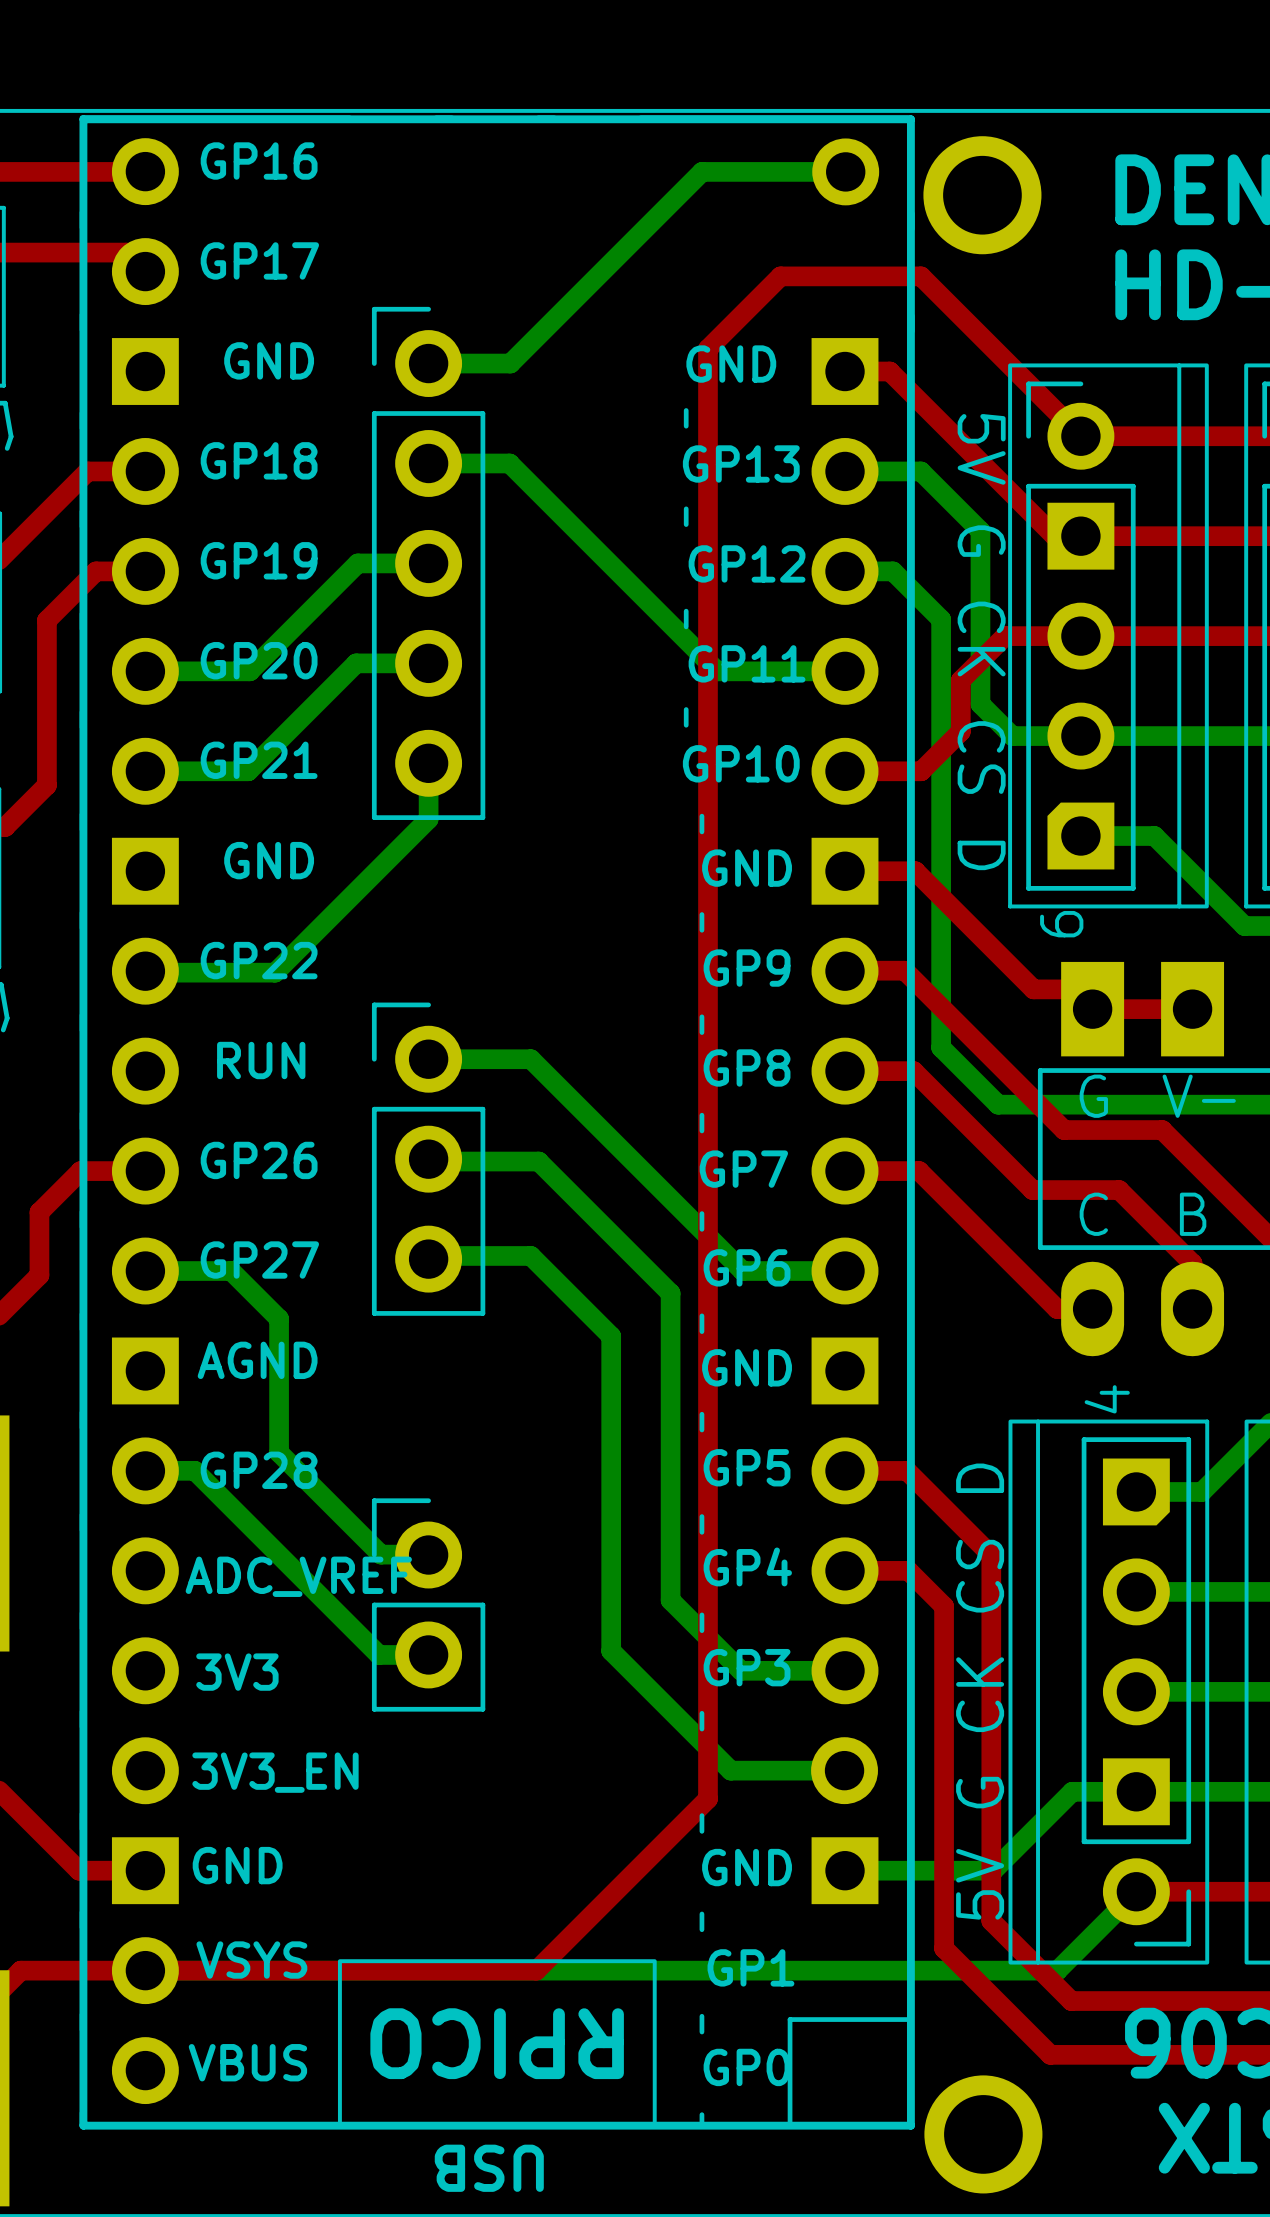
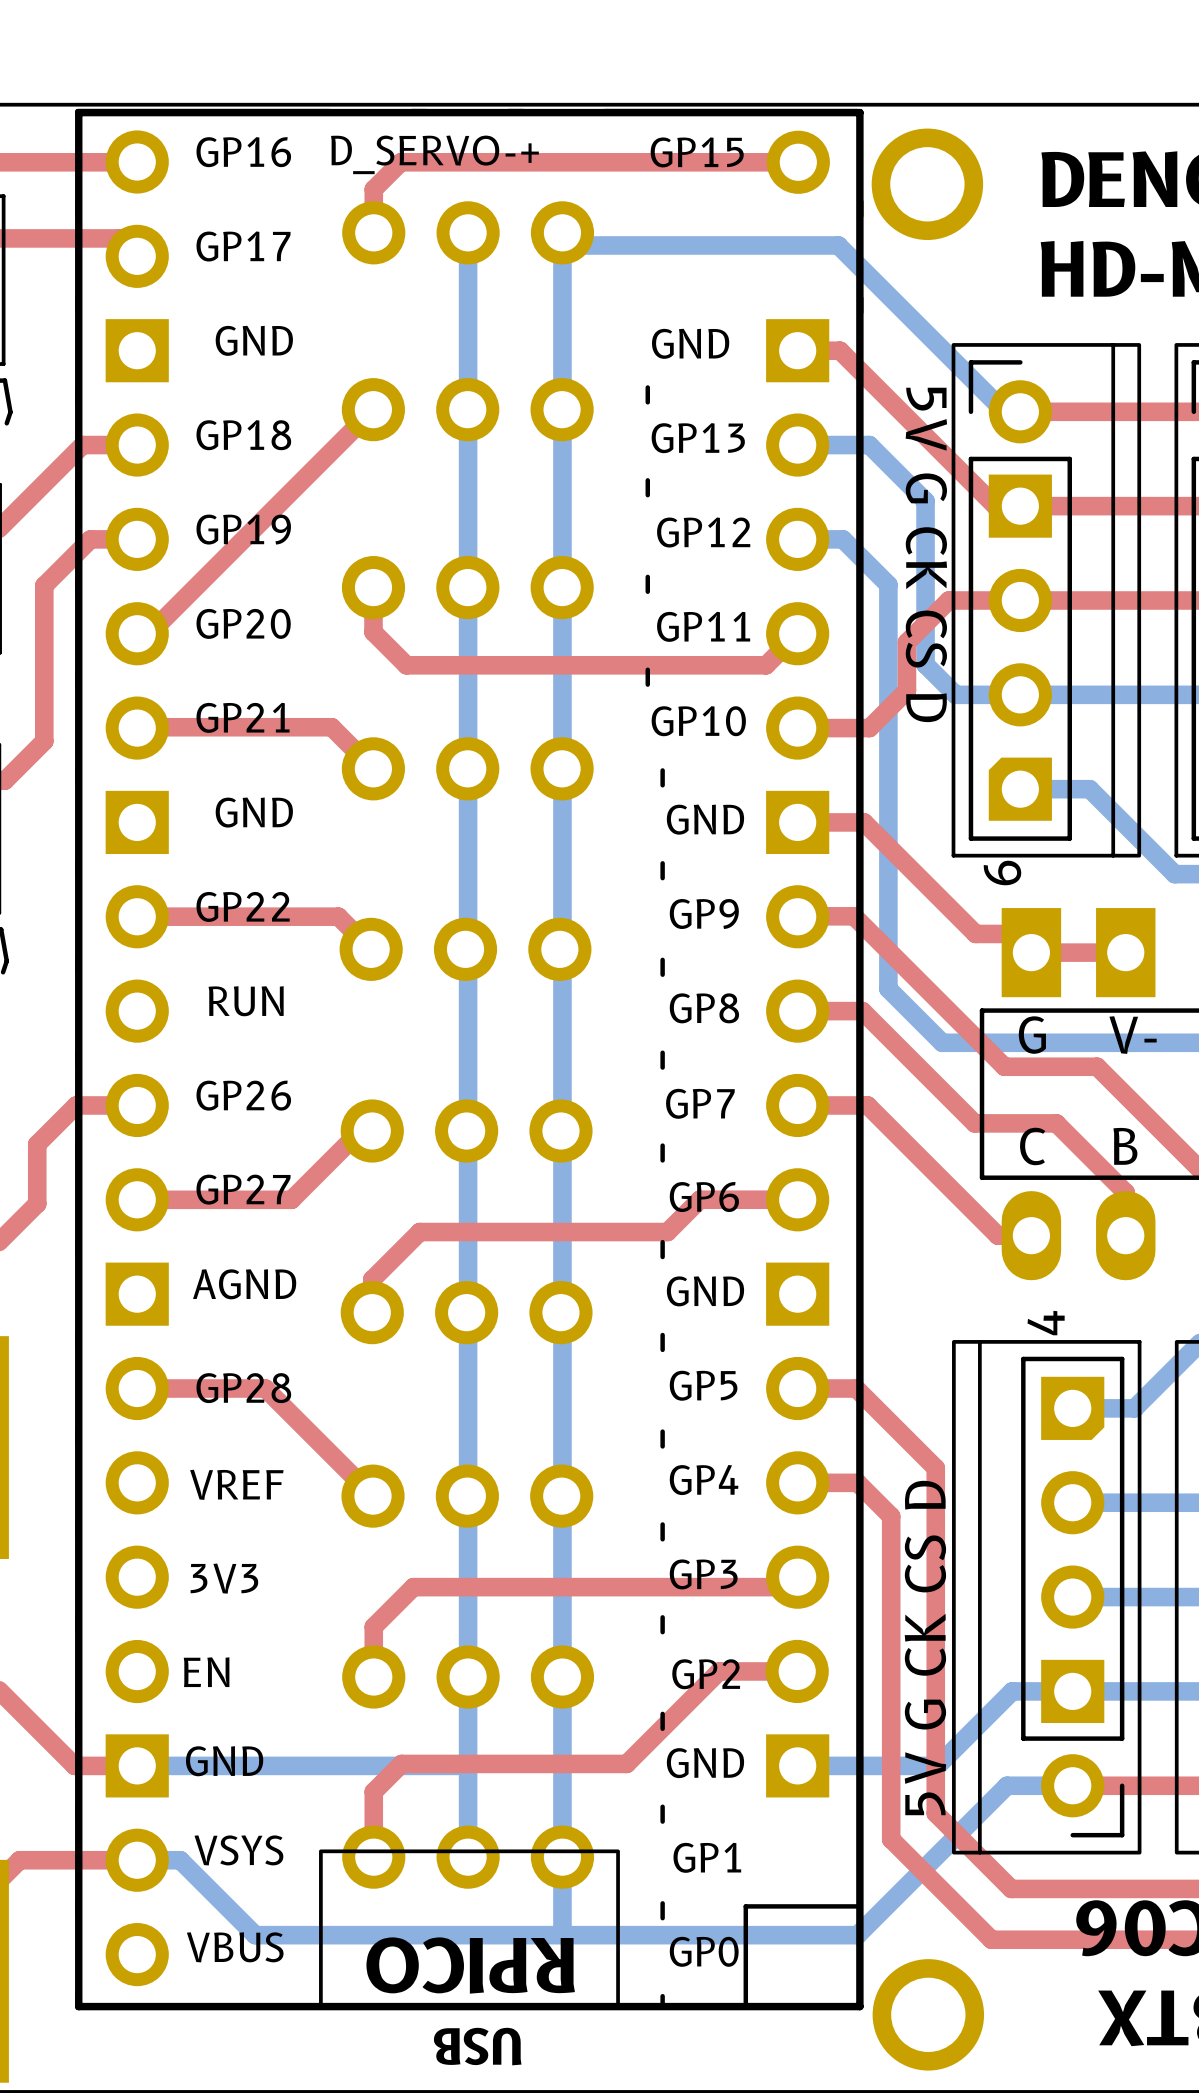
text: none -> D_SERVO-+ (434, 154)
text: none -> GP15 (697, 152)
top track: none -> (798, 162) (400, 162) (373, 189) (373, 232)
bottom track: (845, 171) (702, 171) (510, 363) (428, 363) -> none
bottom track: none -> (468, 232) (468, 1857)
part: none -> (468, 232)
part text: GND (731, 364) -> none
text: none -> GND (690, 343)
top track: none -> (373, 409) (149, 633) (137, 633)
part: none -> (467, 409)
top track: (1080, 436) (921, 276) (780, 276) (707, 348) (707, 1798) (536, 1970) (145, 1970) -> none
bottom track: none -> (1020, 411) (1004, 411) (838, 245) (575, 245) (562, 232) (562, 1934)
bottom track: (428, 463) (509, 463) (717, 671) (845, 671) -> none
bottom track: (428, 563) (357, 563) (249, 671) (145, 671) -> none
part: (428, 563) -> none
top track: none -> (373, 587) (373, 632) (406, 665) (766, 665) (797, 633)
part: none -> (467, 587)
bottom track: (428, 663) (356, 663) (248, 771) (145, 771) -> none
bottom track: (428, 763) (428, 819) (275, 972) (145, 971) -> none
top track: none -> (138, 727) (331, 727) (373, 768)
part: none -> (467, 768)
top track: none -> (137, 916) (338, 916) (371, 949)
part: none -> (465, 949)
bottom track: (428, 1059) (530, 1059) (742, 1271) (845, 1271) -> none
bottom track: (428, 1159) (430, 1161) (538, 1161) (670, 1293) (670, 1600) (741, 1670) (845, 1670) -> none
part: (428, 1159) -> none
top track: none -> (360, 1131) (291, 1199) (137, 1199) (140, 1203)
part: none -> (466, 1131)
bottom track: (428, 1259) (431, 1255) (530, 1255) (611, 1336) (611, 1651) (730, 1770) (844, 1770) -> none
top track: none -> (797, 1199) (699, 1199) (667, 1232) (419, 1232) (372, 1279) (372, 1312)
bottom track: (145, 1271) (231, 1271) (279, 1318) (279, 1452) (381, 1554) (428, 1554) -> none
part: none -> (466, 1312)
top track: none -> (137, 1388) (265, 1388) (373, 1496)
bottom track: (145, 1470) (194, 1470) (379, 1654) (428, 1654) -> none
part text: none -> VREF (236, 1484)
part text: ADC_VREF (298, 1576) -> none
part: none -> (467, 1496)
part: (428, 1604) -> none
top track: none -> (797, 1577) (787, 1587) (413, 1587) (373, 1626) (373, 1677)
top track: none -> (797, 1671) (719, 1671) (626, 1763) (401, 1763) (373, 1791) (373, 1857)
part text: none -> EN (206, 1672)
part text: 3V3_EN (275, 1772) -> none
text: none -> GP2 (706, 1674)
part: none -> (468, 1677)
bottom track: none -> (468, 1764) (137, 1765)
bottom track: (1136, 1891) (1057, 1970) (191, 1970) -> (1072, 1785) (1007, 1785) (857, 1935) (255, 1935) (180, 1860)
part: none -> (468, 1857)
part value position: RPICO (497, 2043) -> RPICO (470, 1965)

